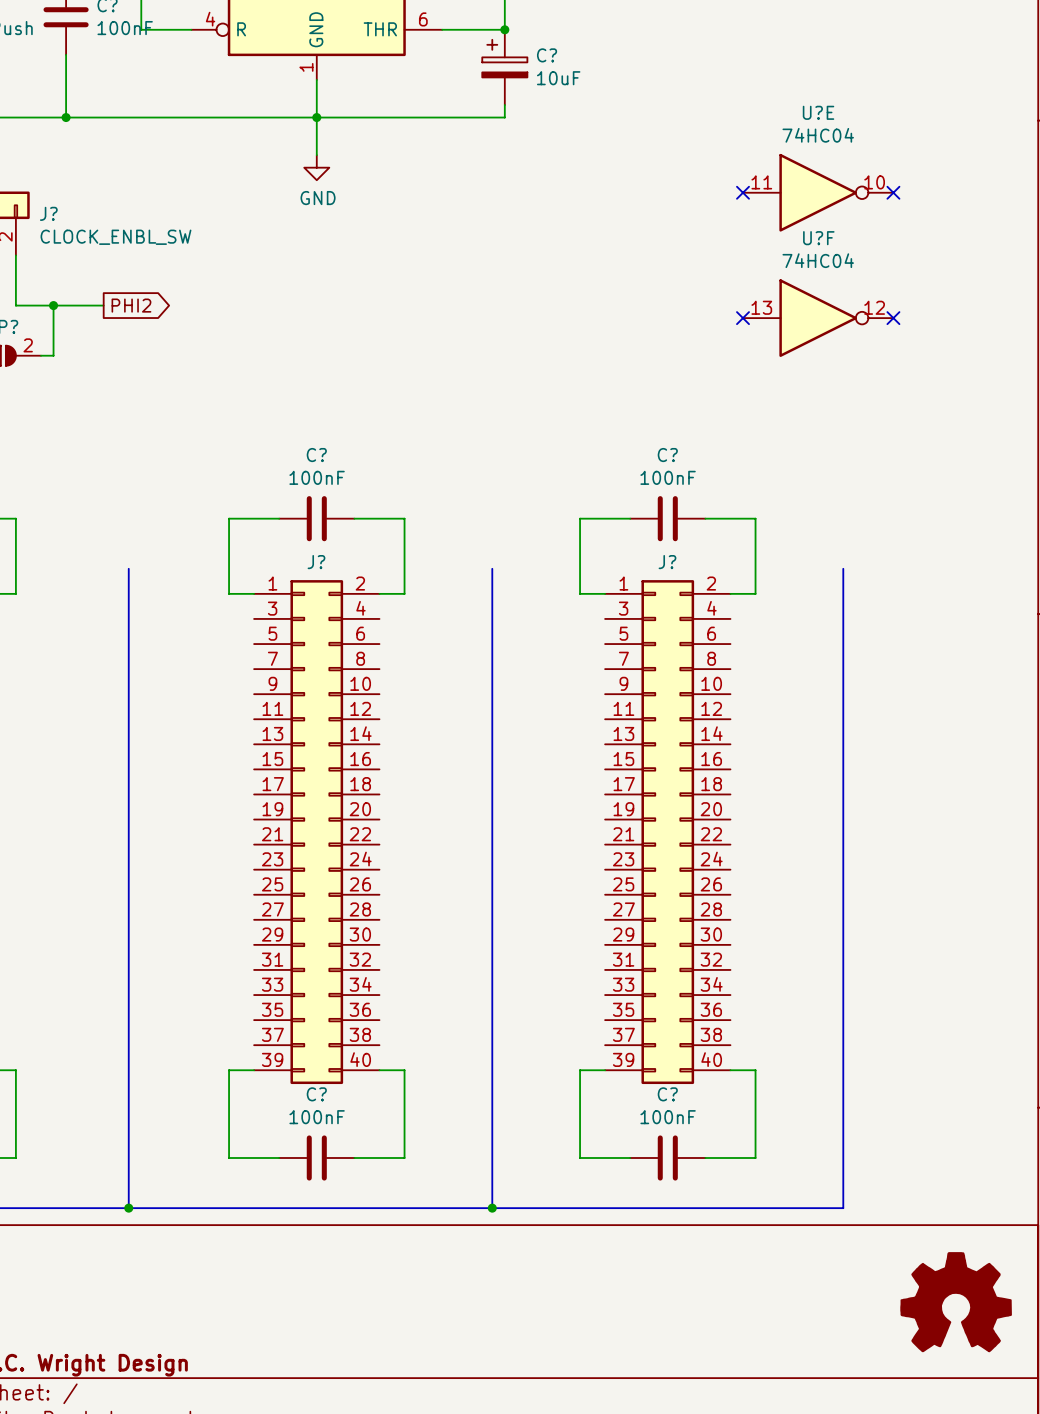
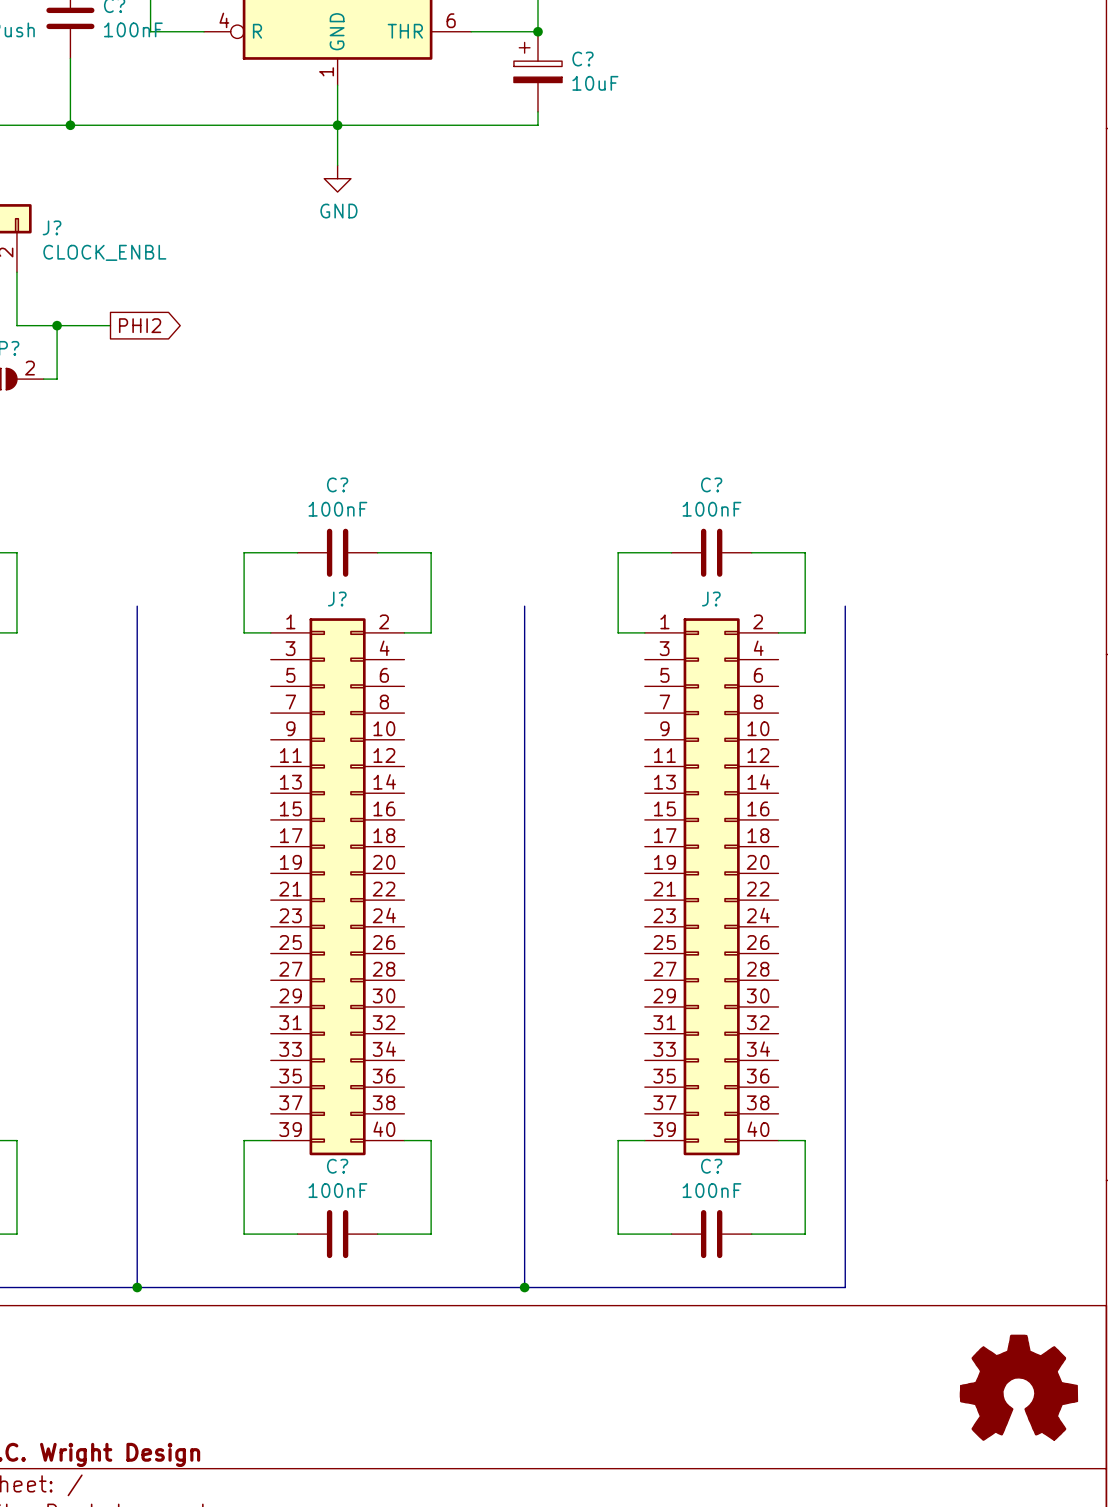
no-connect mark: (743, 192) -> none
U?E: 74HC04 (818, 192) -> none
no-connect mark: (893, 192) -> none
J? value: CLOCK_ENBL_SW (115, 237) -> CLOCK_ENBL (104, 252)
no-connect mark: (743, 318) -> none
U?F: 74HC04 (818, 318) -> none
no-connect mark: (893, 318) -> none
bus: (843, 568) (843, 1208) (793, 1208) -> (845, 606) (845, 1287)

